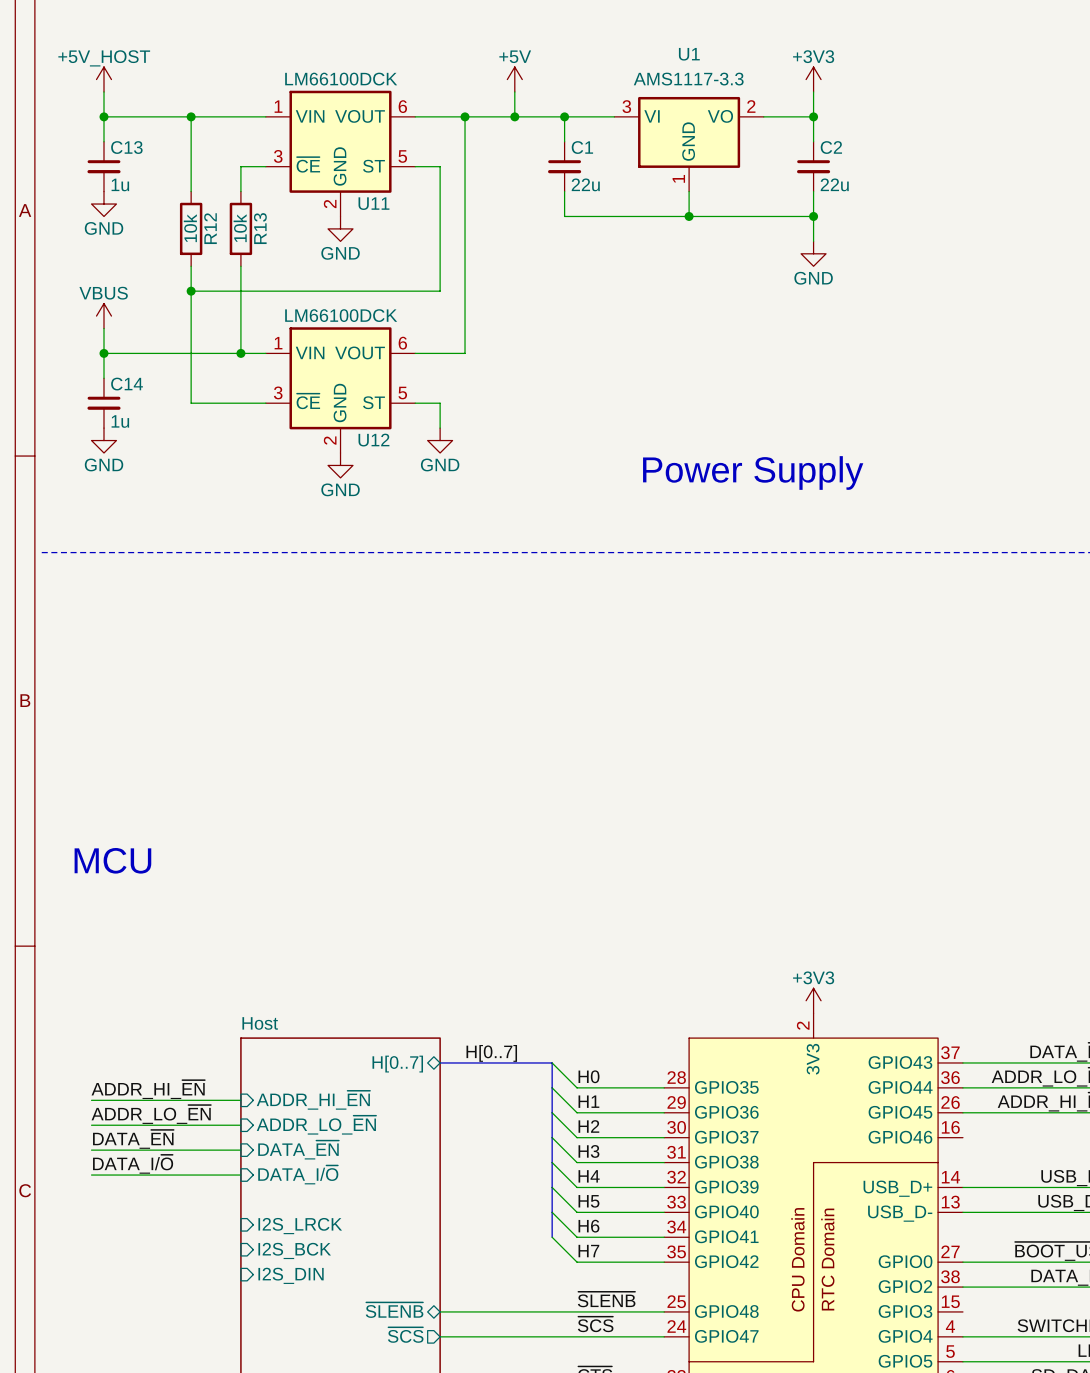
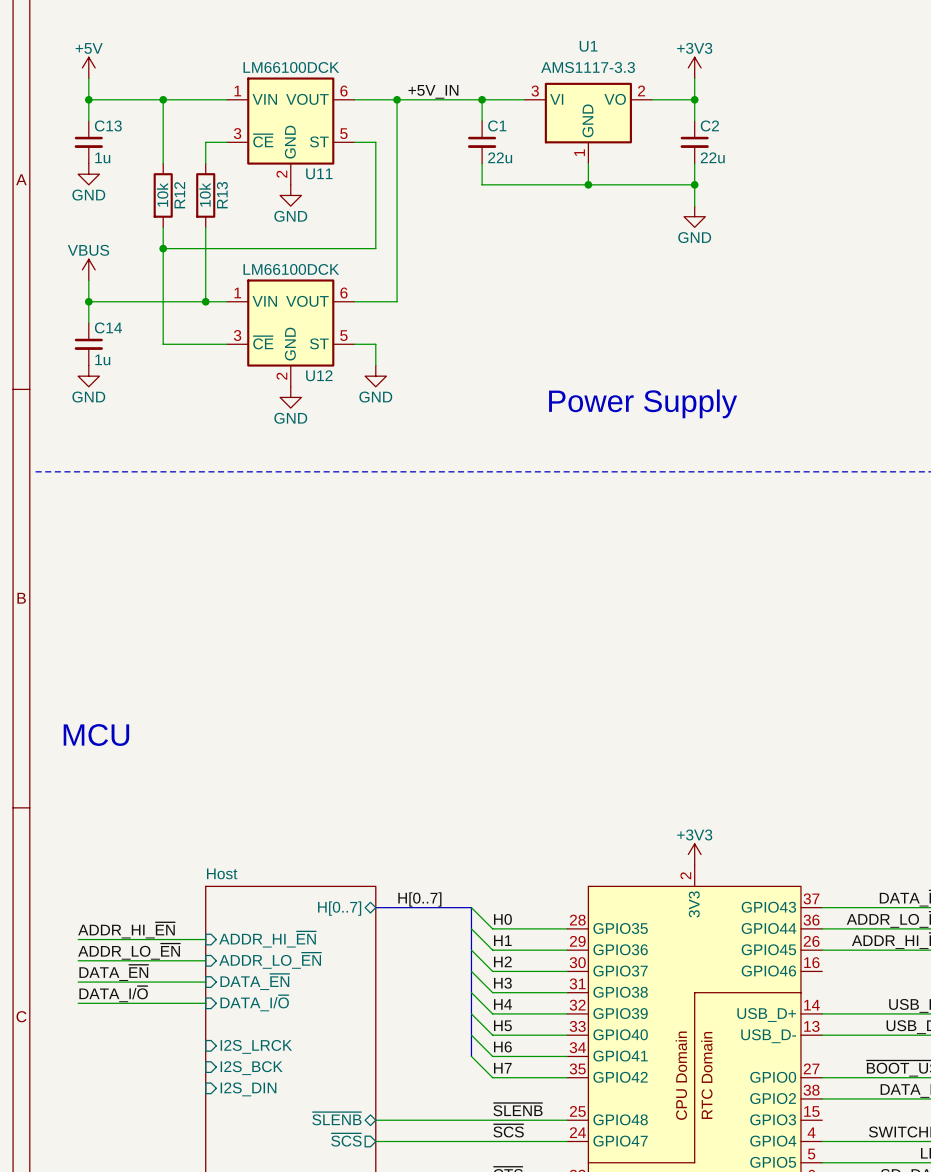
power symbol: +5V_HOST (103, 79) -> +5V (88, 67)
power symbol: +5V (514, 79) -> none
wire: (514, 91) (514, 116) -> none
label: none -> +5V_IN (433, 91)
junction: (514, 116) -> none

